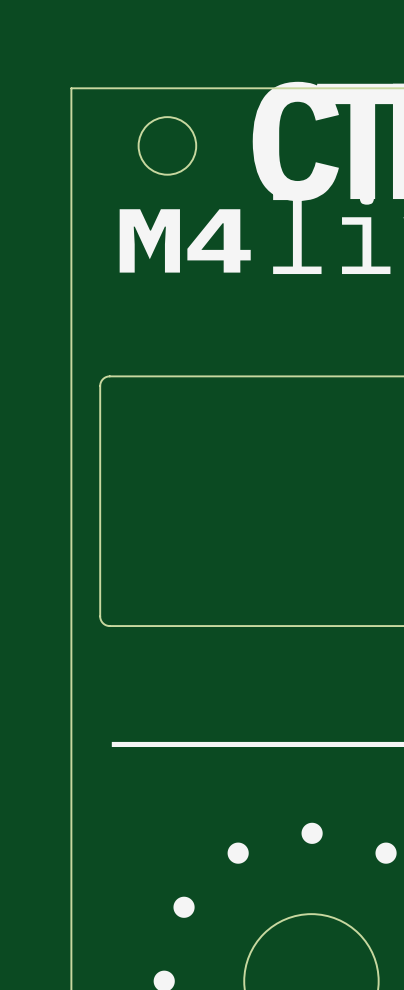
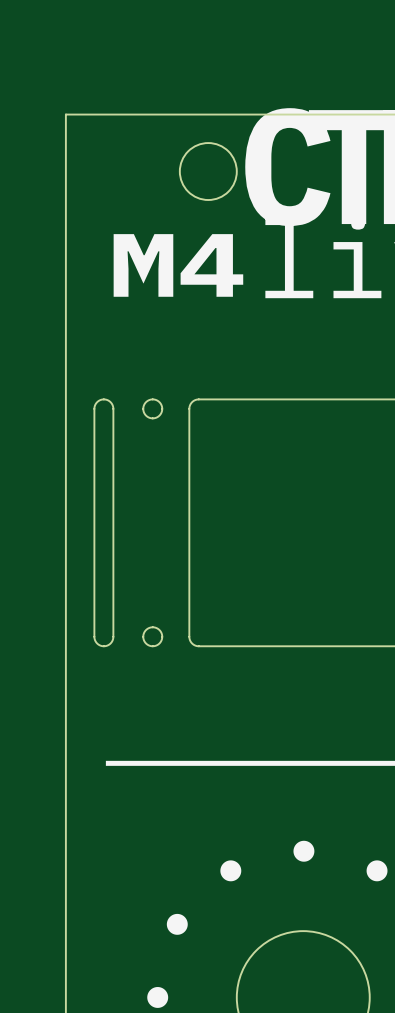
round board edge position: (167, 145) -> (208, 171)
board edge: (109, 376) (205, 376) -> (103, 399) (110, 402) (113, 408) (113, 636) (110, 643) (103, 646)
board edge: none -> (152, 399) (146, 402) (143, 408) (146, 415) (152, 418) (159, 415) (162, 408) (159, 402) (152, 399)
board edge: none -> (152, 627) (159, 630) (162, 636) (159, 643) (152, 646) (146, 643) (143, 636) (146, 630) (152, 627)
board edge: (109, 626) (205, 626) -> (198, 399) (192, 402) (189, 408) (189, 636) (192, 643) (198, 646)

